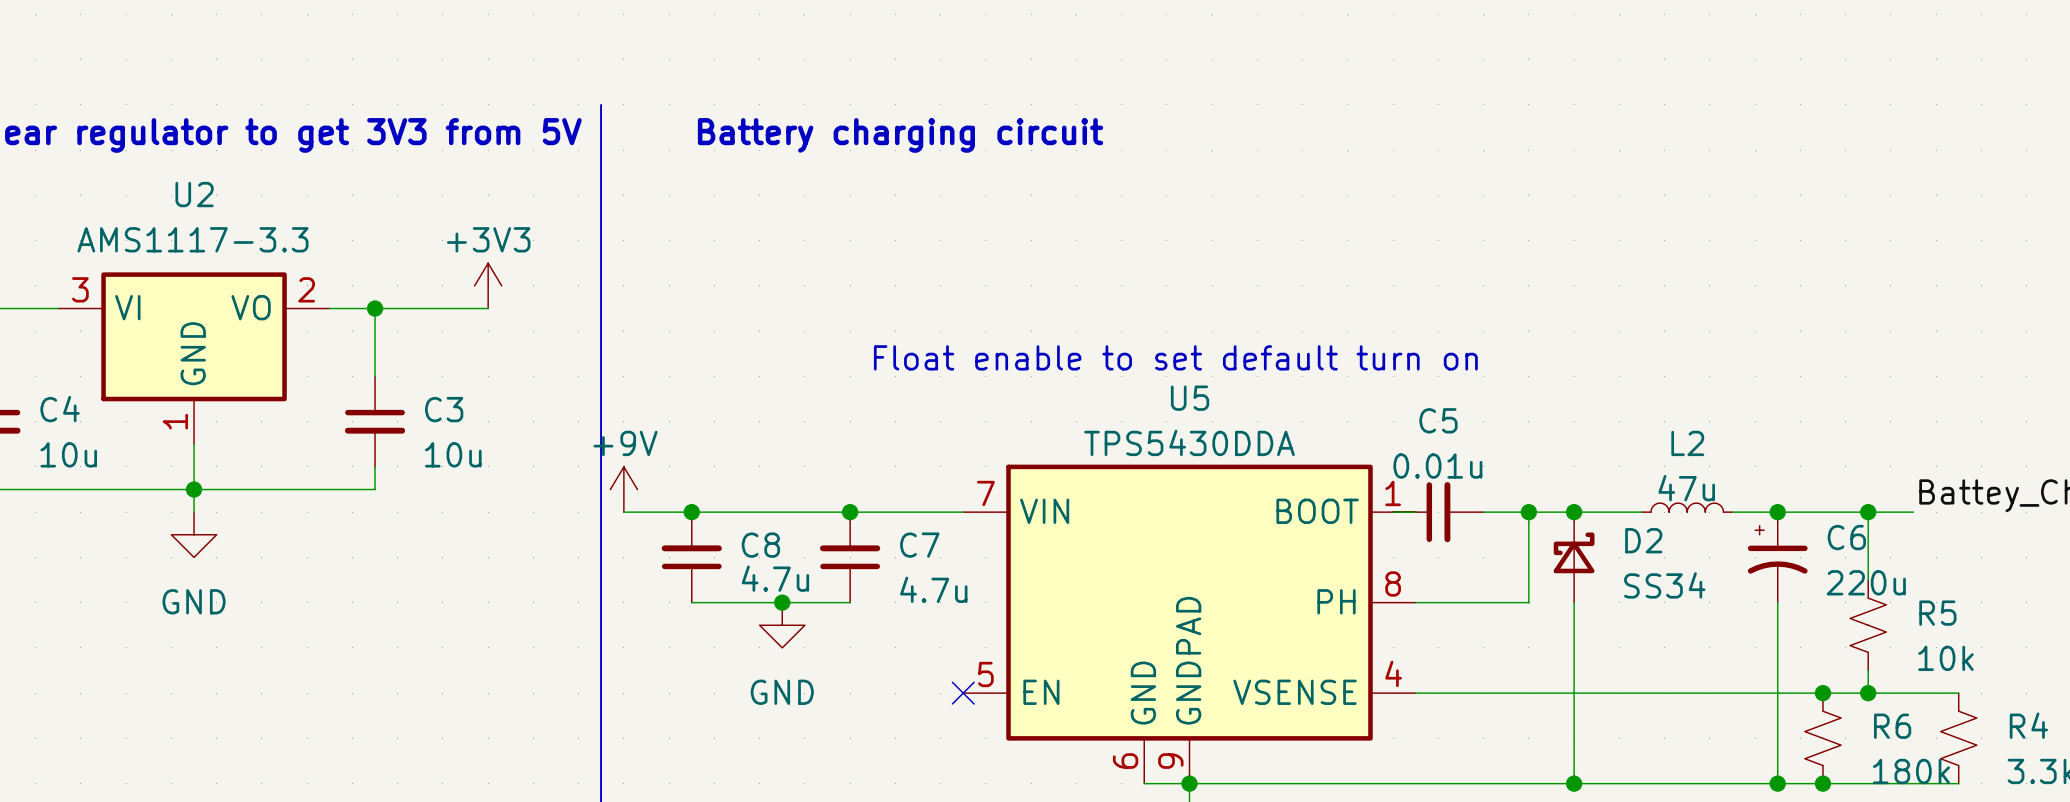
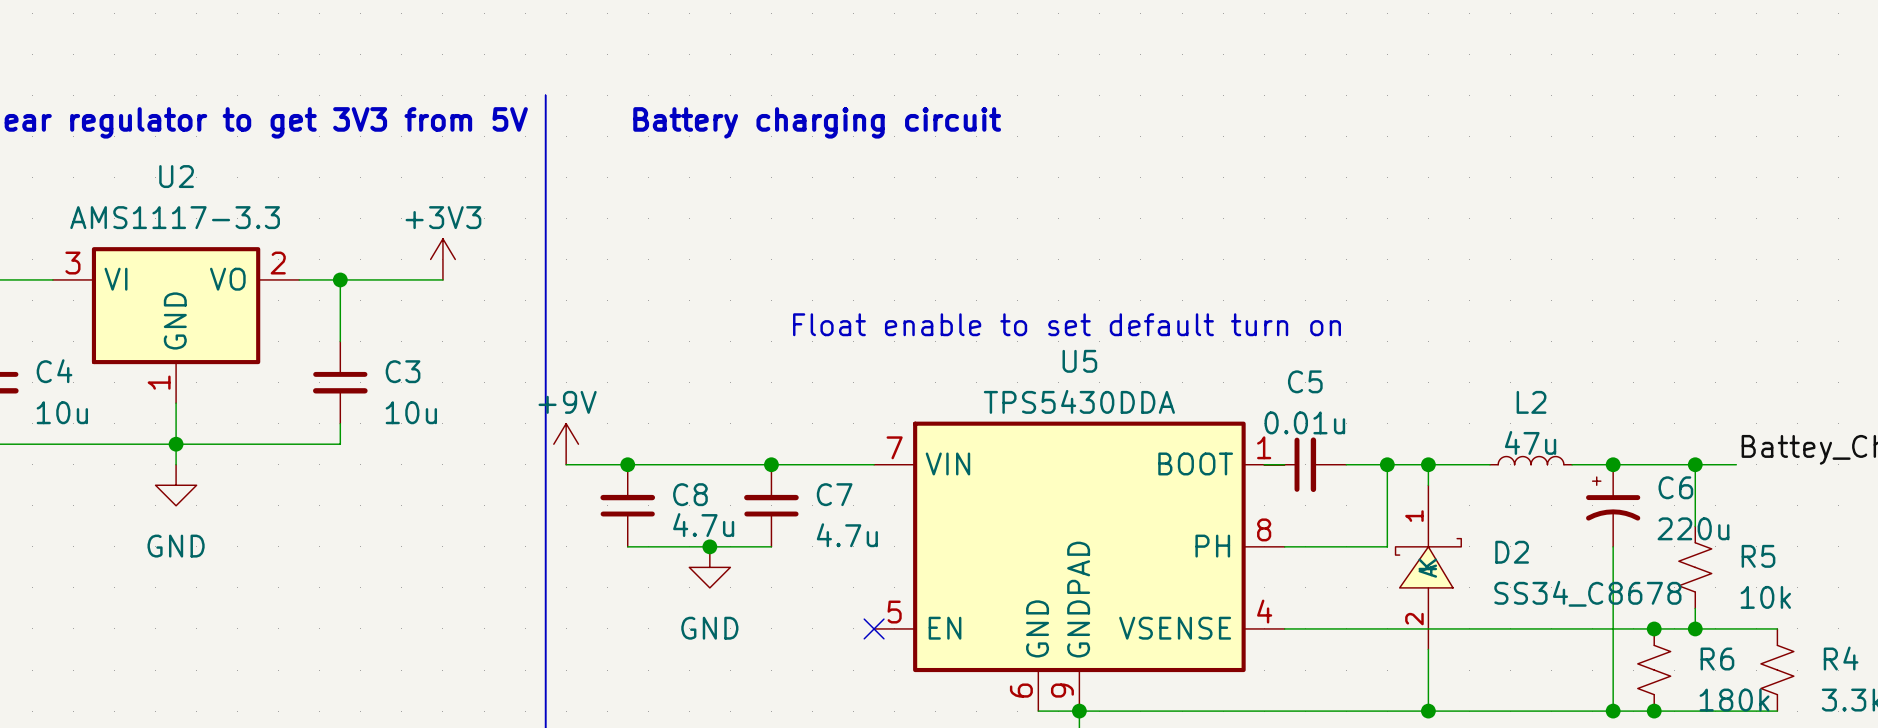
D2 symbol: [1553, 512, 1595, 603] -> [1395, 485, 1462, 650]
D2 value: SS34 (1664, 585) -> SS34_C8678 (1587, 593)

